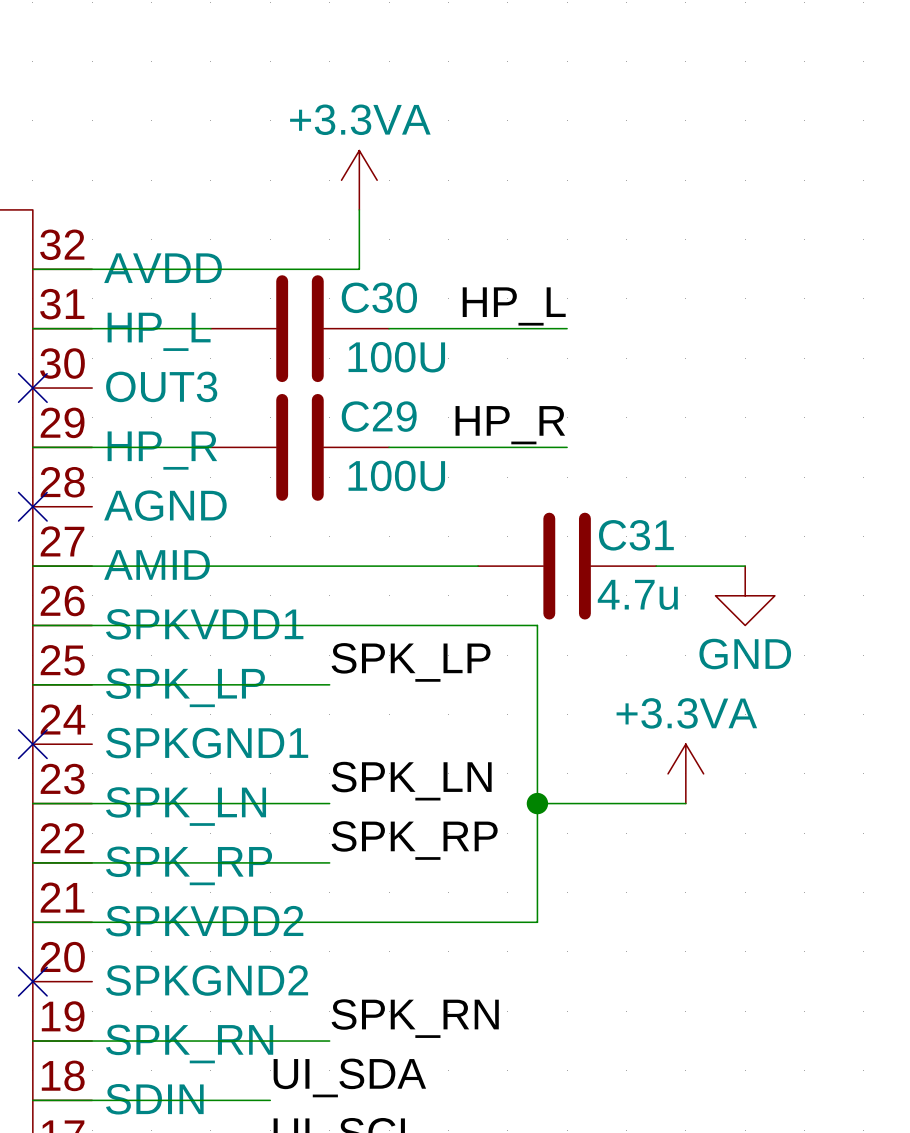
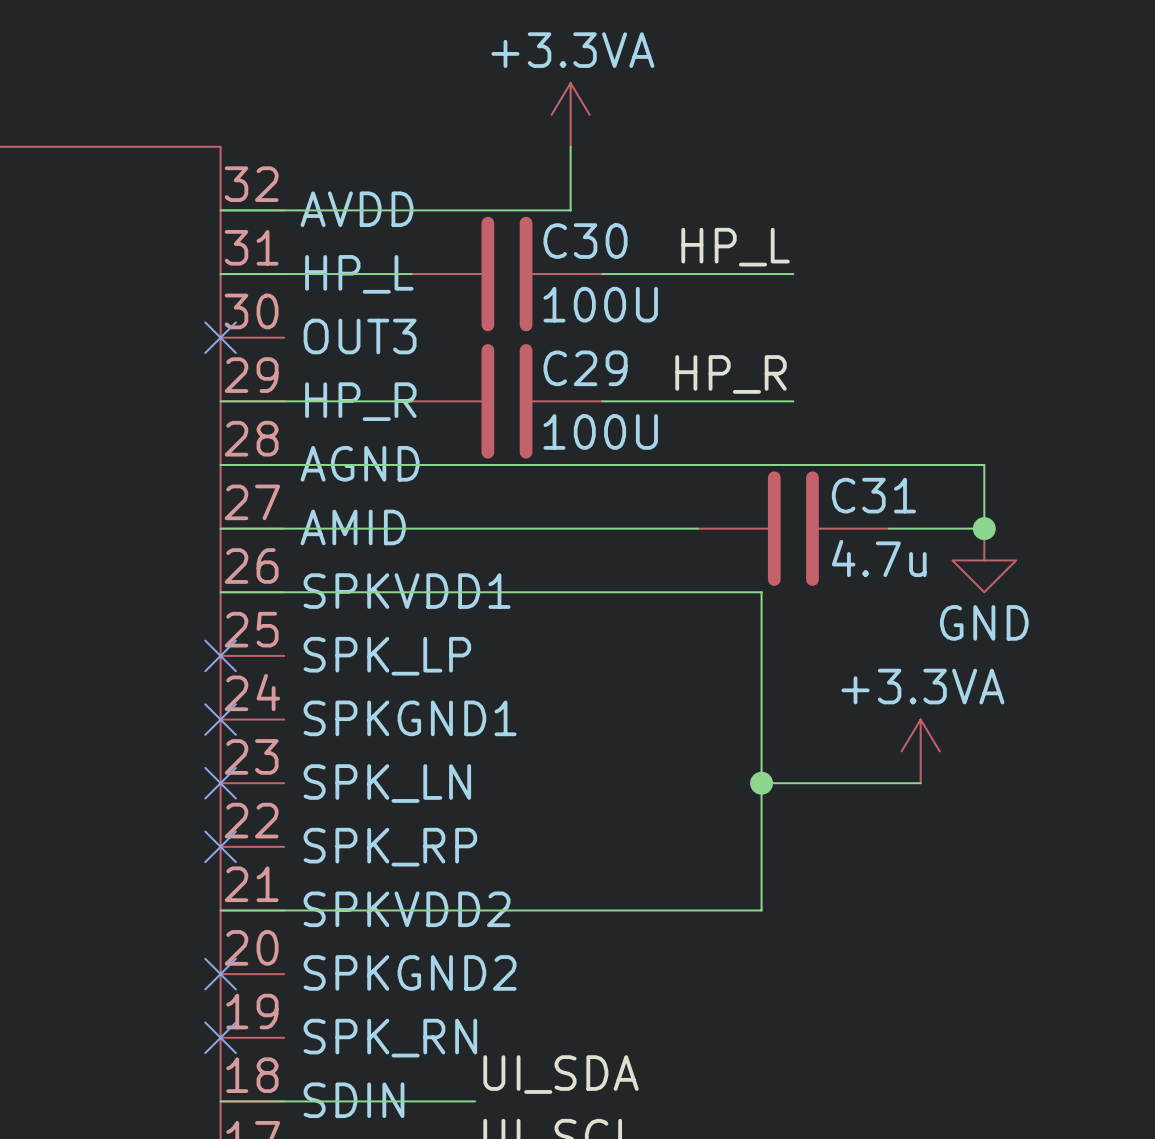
wire: none -> (220, 464) (984, 464) (984, 528)
no-connect mark: (32, 506) -> none
junction: none -> (984, 528)
label: SPK_LP (411, 662) -> none
wire: (32, 684) (329, 684) -> none
no-connect mark: none -> (220, 655)
label: SPK_LN (411, 781) -> none
wire: (32, 803) (329, 803) -> none
no-connect mark: none -> (220, 783)
label: SPK_RP (414, 840) -> none
wire: (32, 862) (329, 862) -> none
no-connect mark: none -> (220, 846)
label: SPK_RN (415, 1018) -> none
wire: (32, 1041) (329, 1041) -> none
no-connect mark: none -> (220, 1037)

